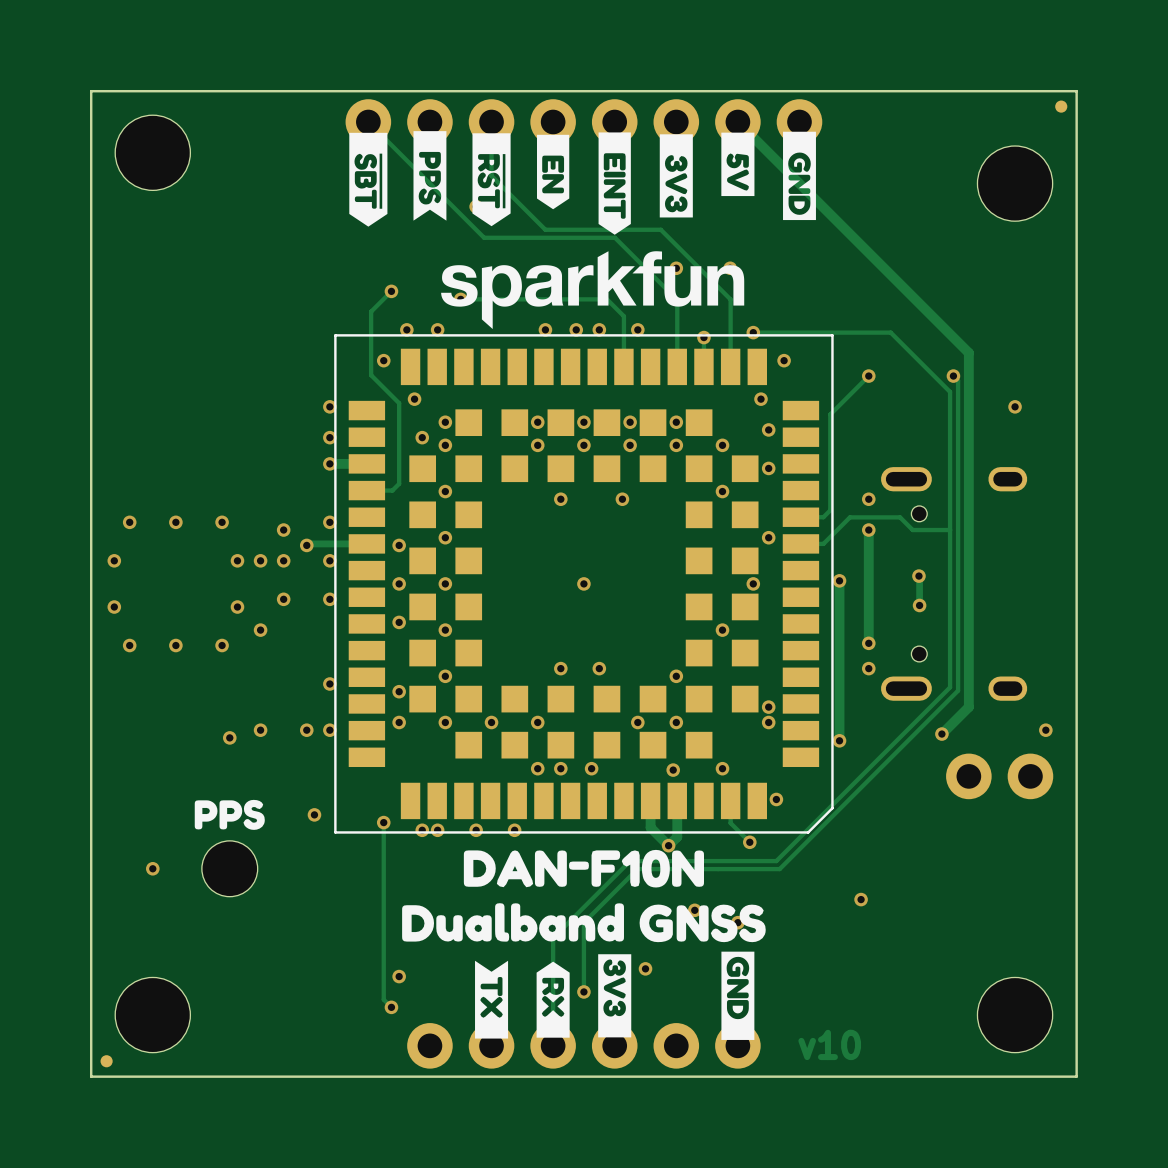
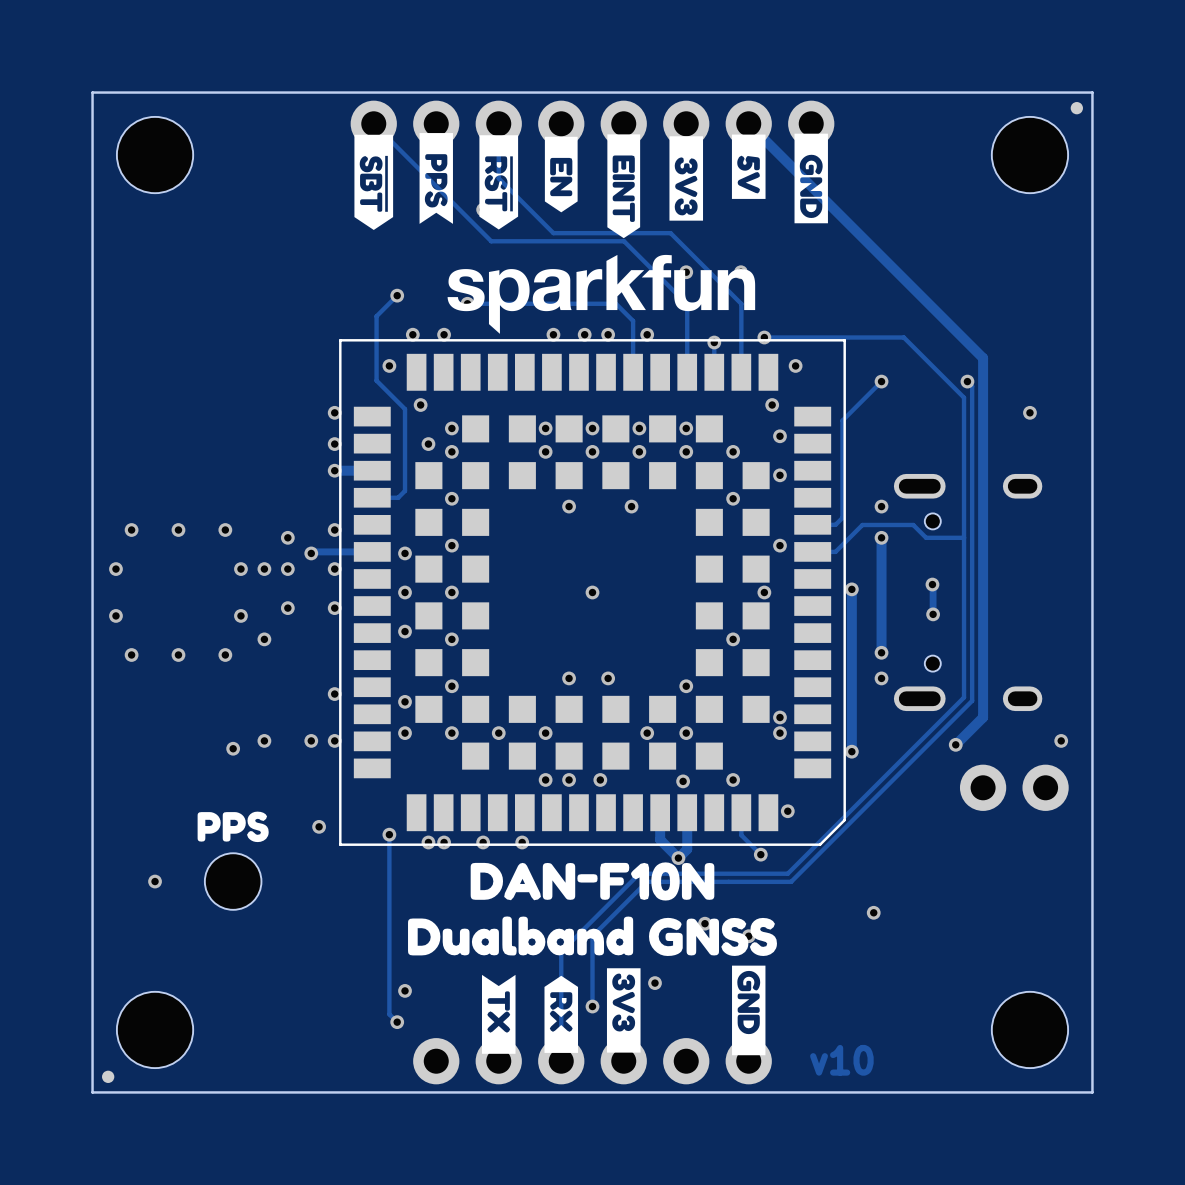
part position: (1015, 183) -> (1029, 155)

